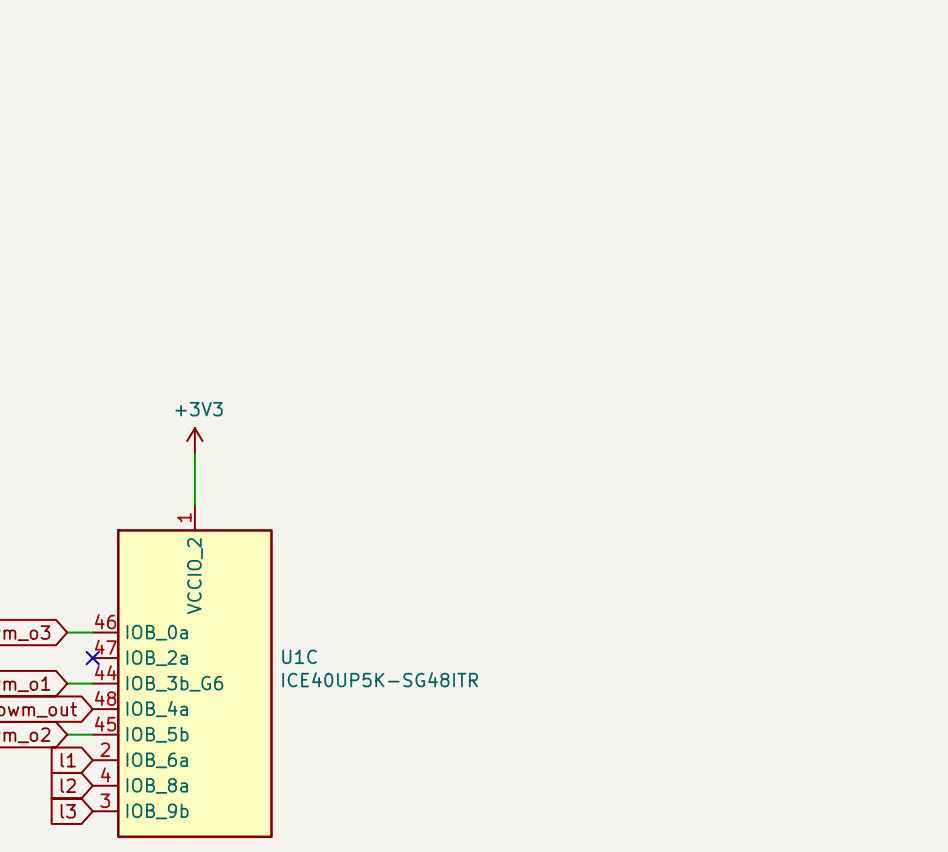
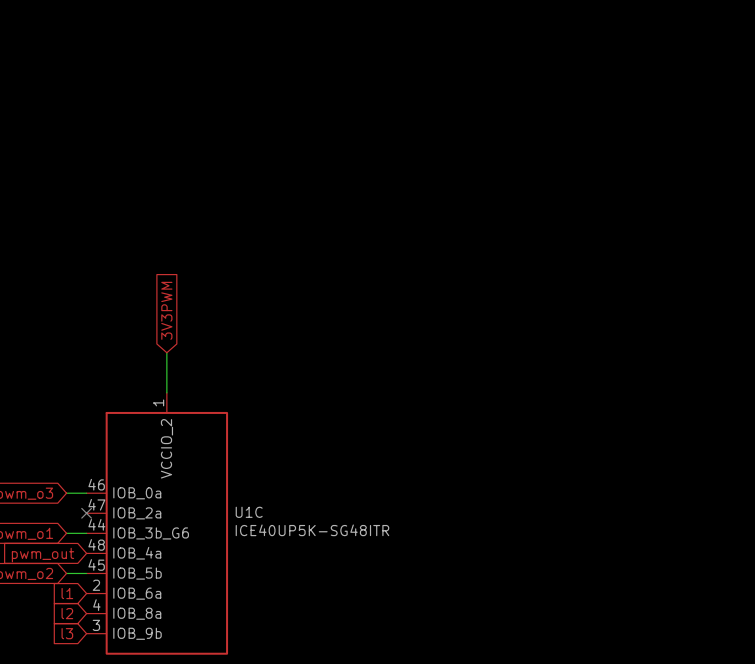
global label: none -> 3V3PWM (166, 310)
power symbol: +3V3 (194, 441) -> none

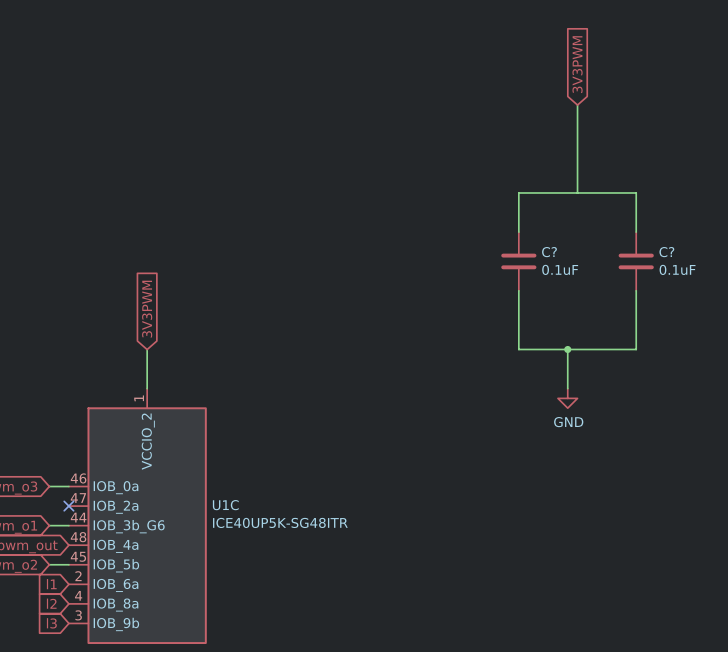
global label: none -> 3V3PWM (577, 64)
wire: none -> (577, 105) (577, 193)
wire: none -> (518, 232) (518, 192) (636, 192) (636, 232)
C?: none -> 0.1uF (518, 261)
C?: none -> 0.1uF (636, 261)
wire: none -> (518, 290) (518, 349) (636, 349) (636, 290)
wire: none -> (567, 349) (567, 388)
junction: none -> (567, 349)
power symbol: none -> GND (567, 398)

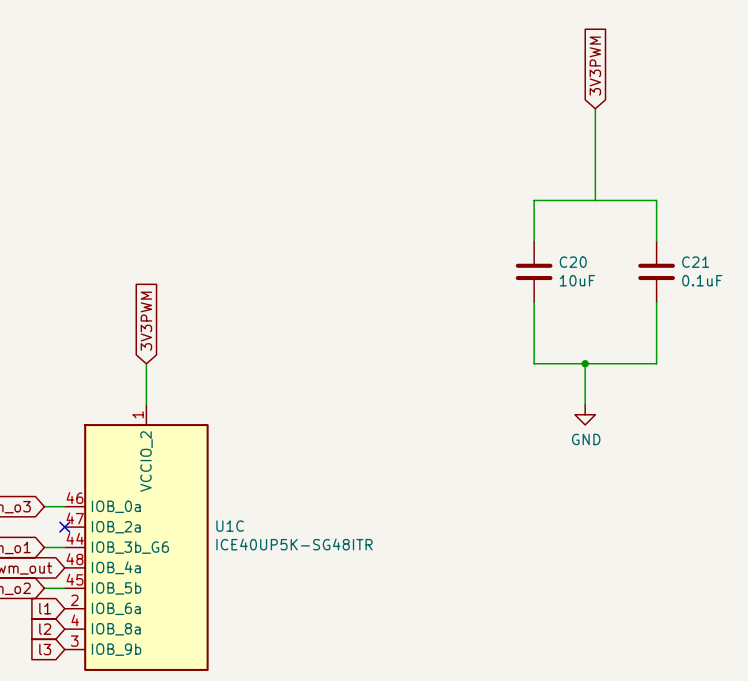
C? name: C? (549, 252) -> C20 (573, 262)
C? name: C? (666, 252) -> C21 (695, 262)
C? value: 0.1uF (560, 269) -> 10uF (577, 280)

